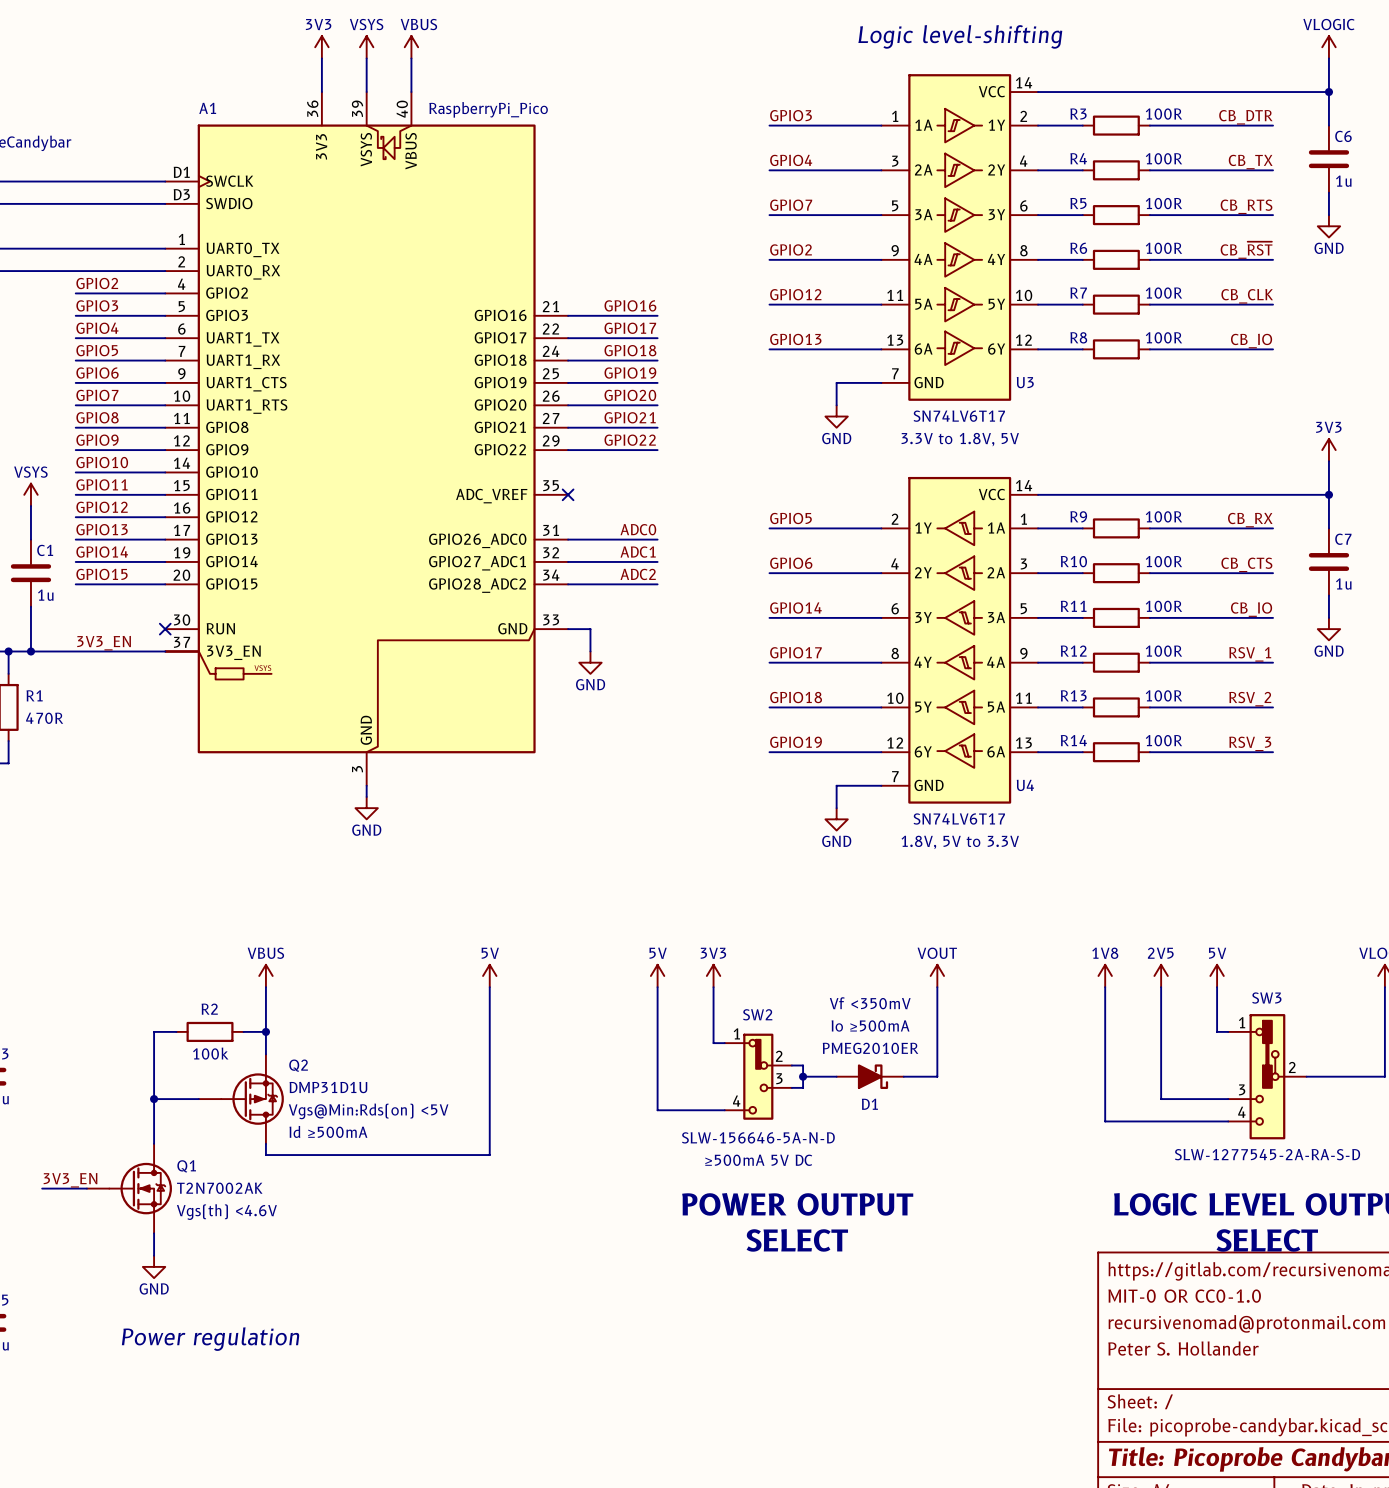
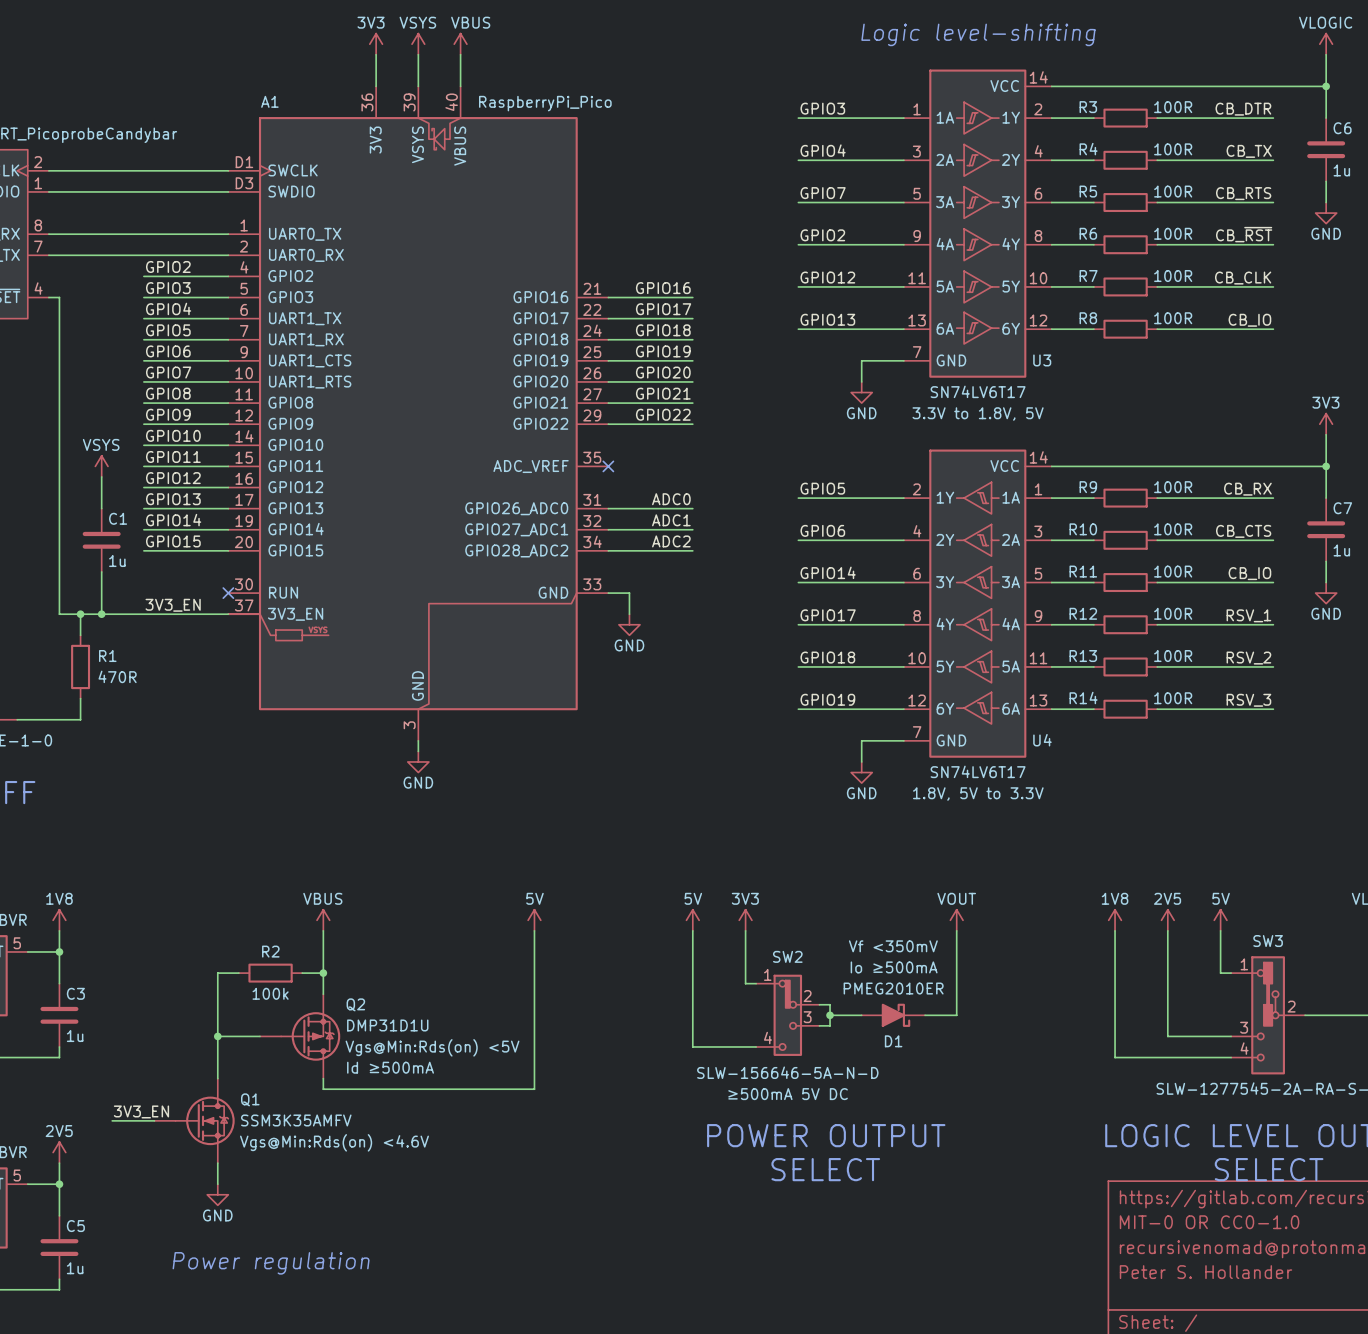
Q1 value: T2N7002AK (219, 1188) -> SSM3K35AMFV (296, 1120)
Q1 text: Vgs(th) <4.6V (226, 1212) -> Vgs@Min:Rds(on) <4.6V (334, 1142)

